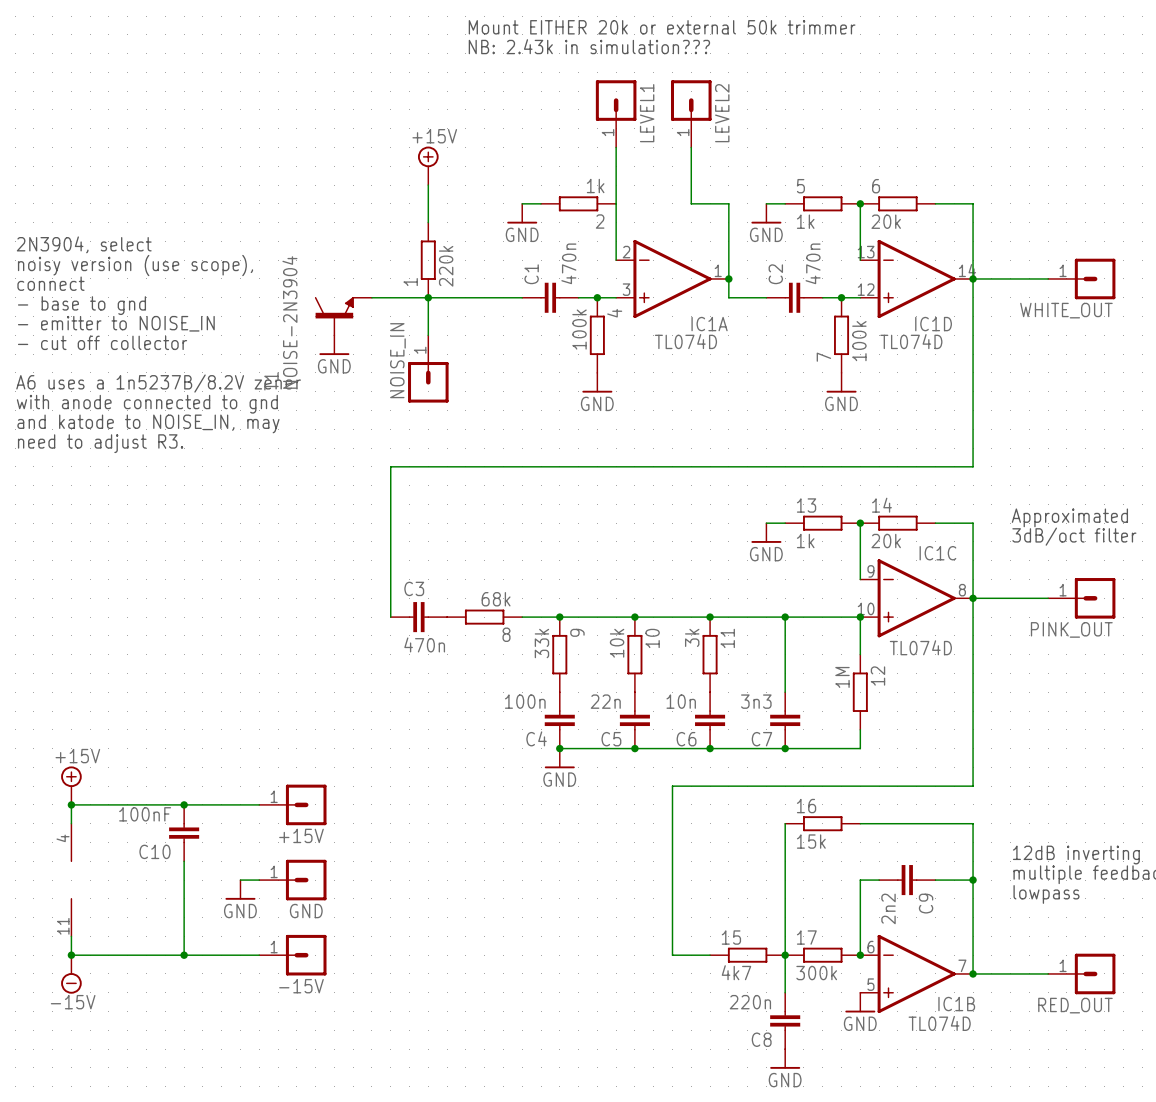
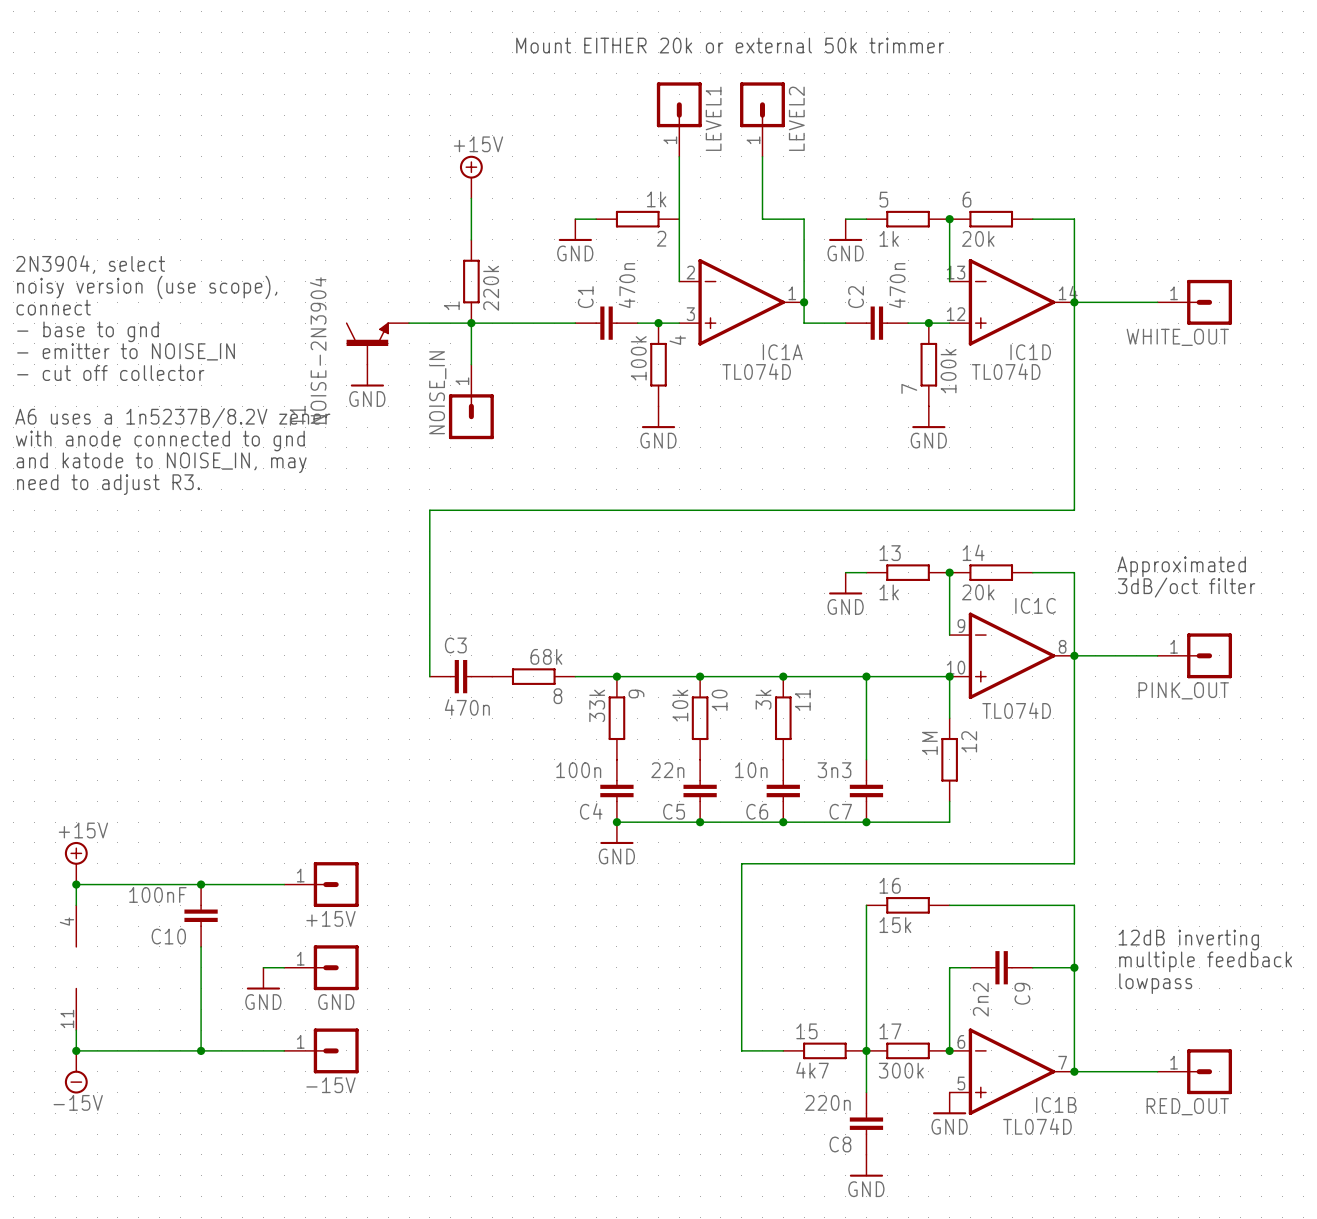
text: Mount EITHER 20k or external 50k trimmer (662, 27) -> none
text: NB: 2.43k in simulation??? (589, 46) -> Mount EITHER 20k or external 50k trimmer (730, 45)

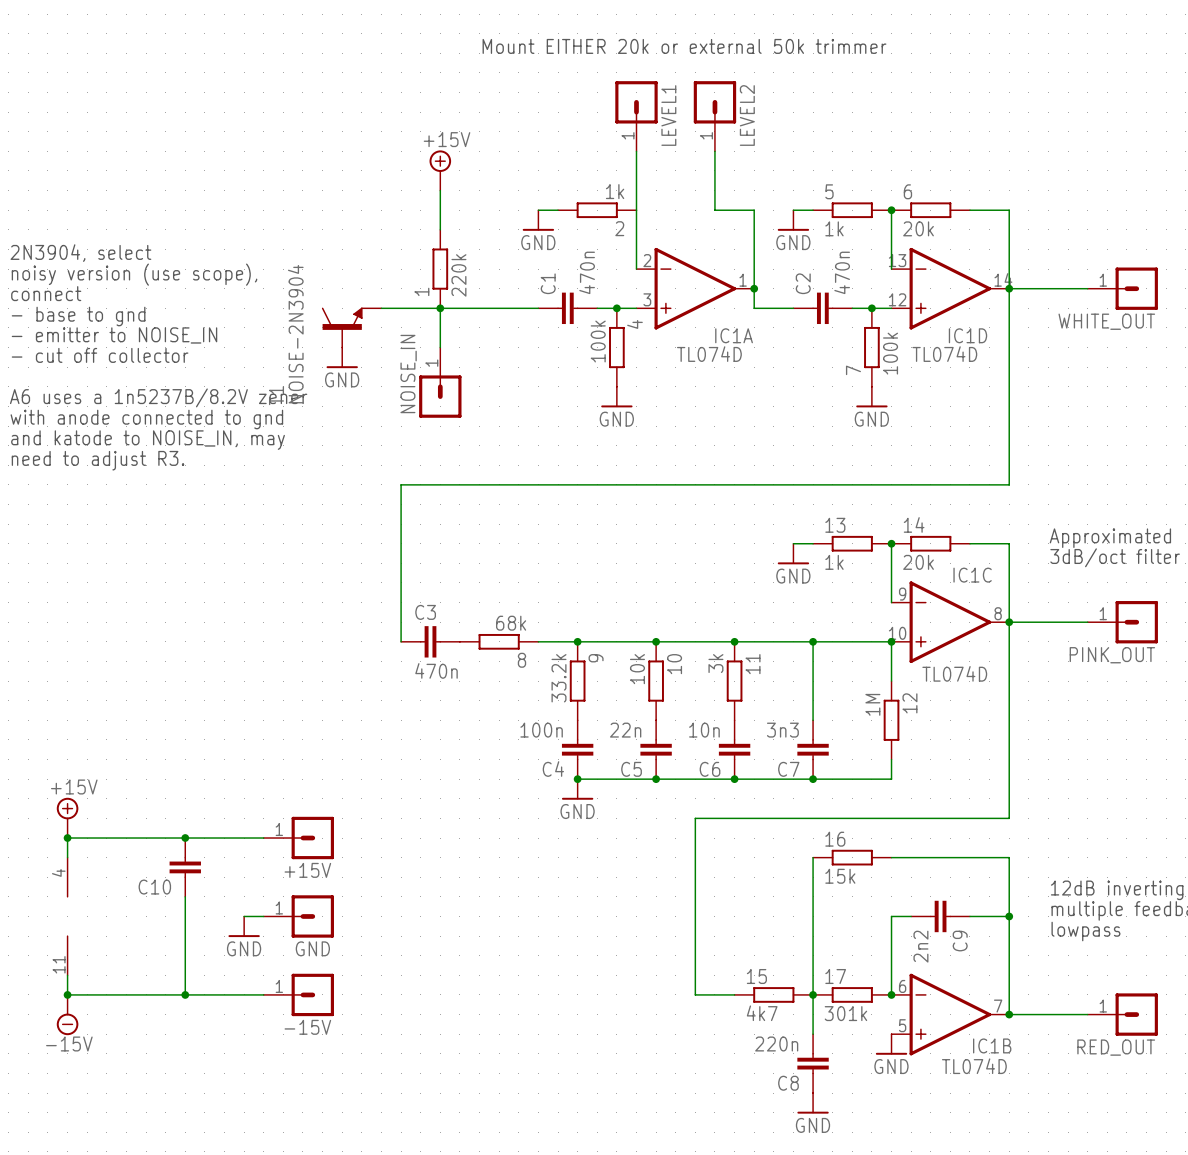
9 value: 33k (597, 705) -> 33.2k (559, 678)
C10 value: 100nF (157, 894) -> none
17 value: 300k (901, 1070) -> 301k (845, 1013)

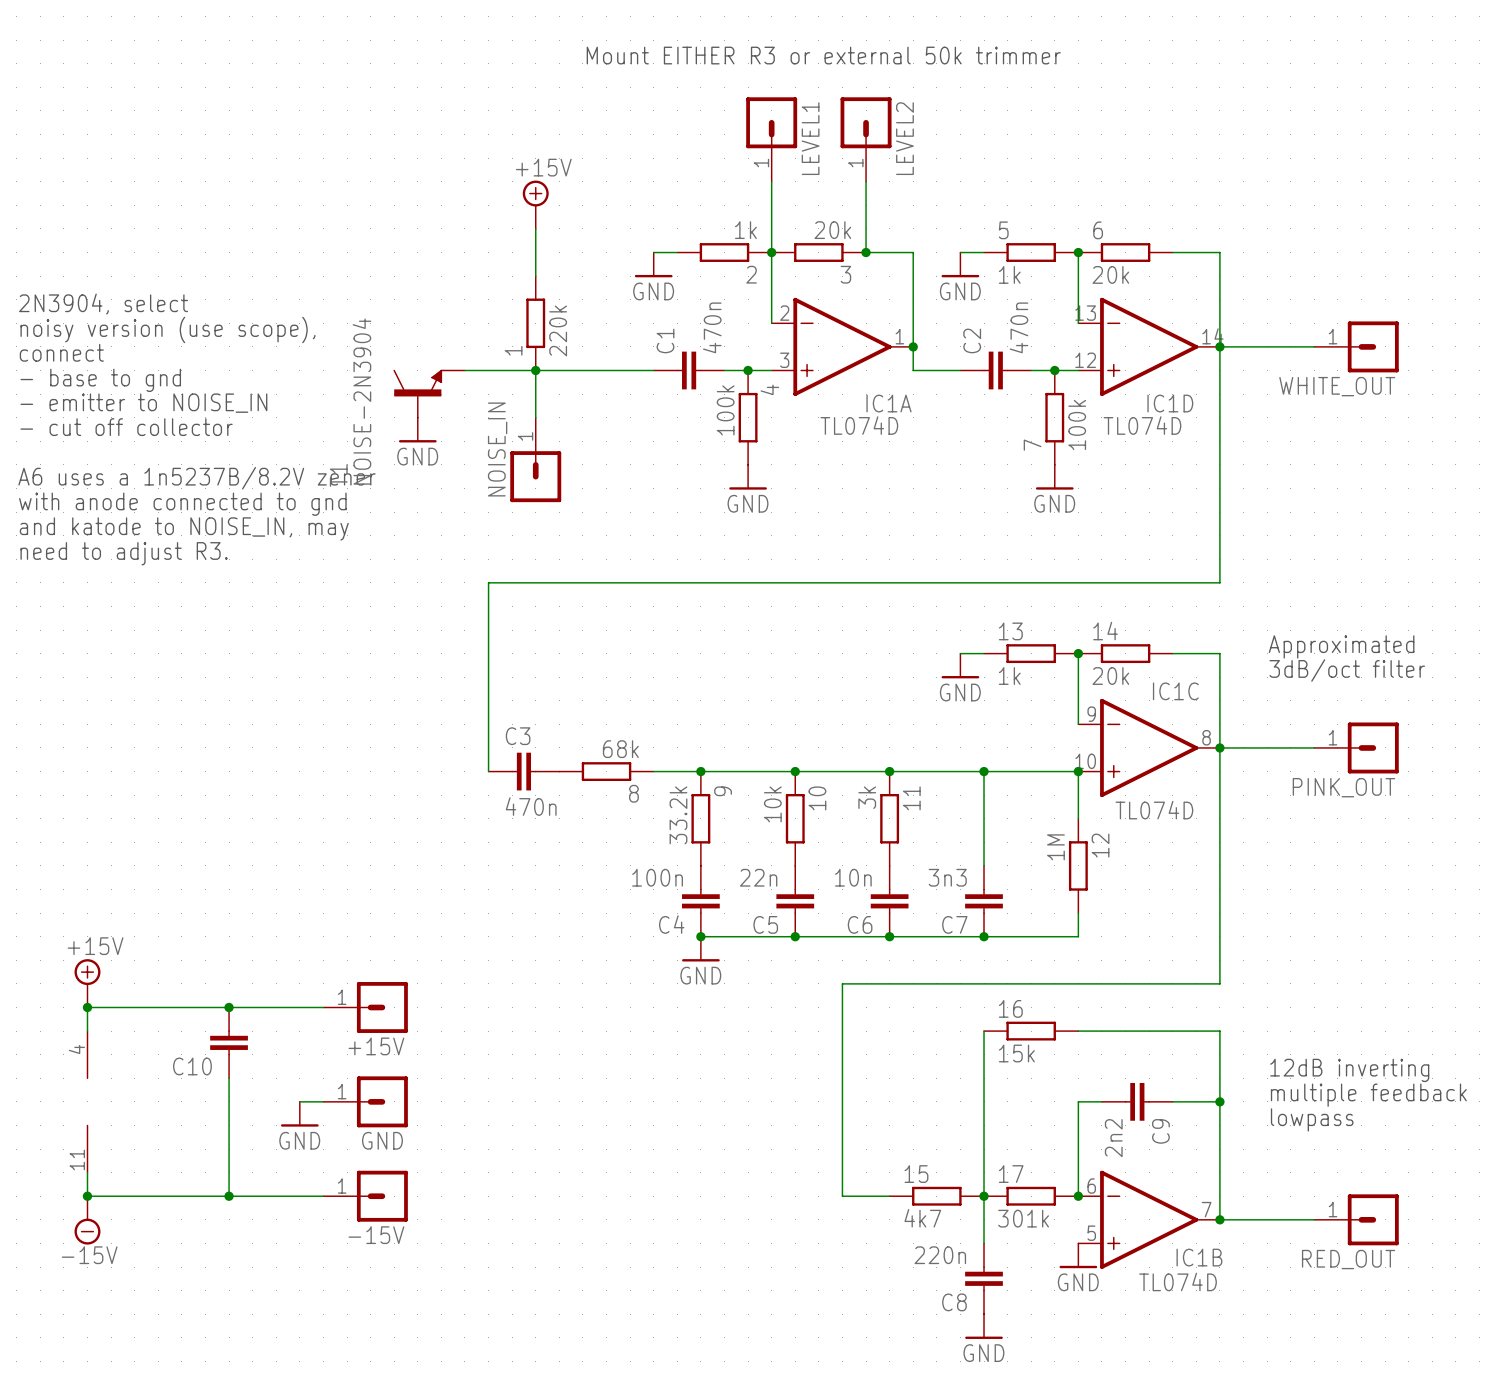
text: Mount EITHER 20k or external 50k trimmer (684, 46) -> Mount EITHER R3 or external 50k trimmer (823, 55)
junction: none -> (771, 252)
3: none -> 20k (818, 252)
junction: none -> (866, 252)

